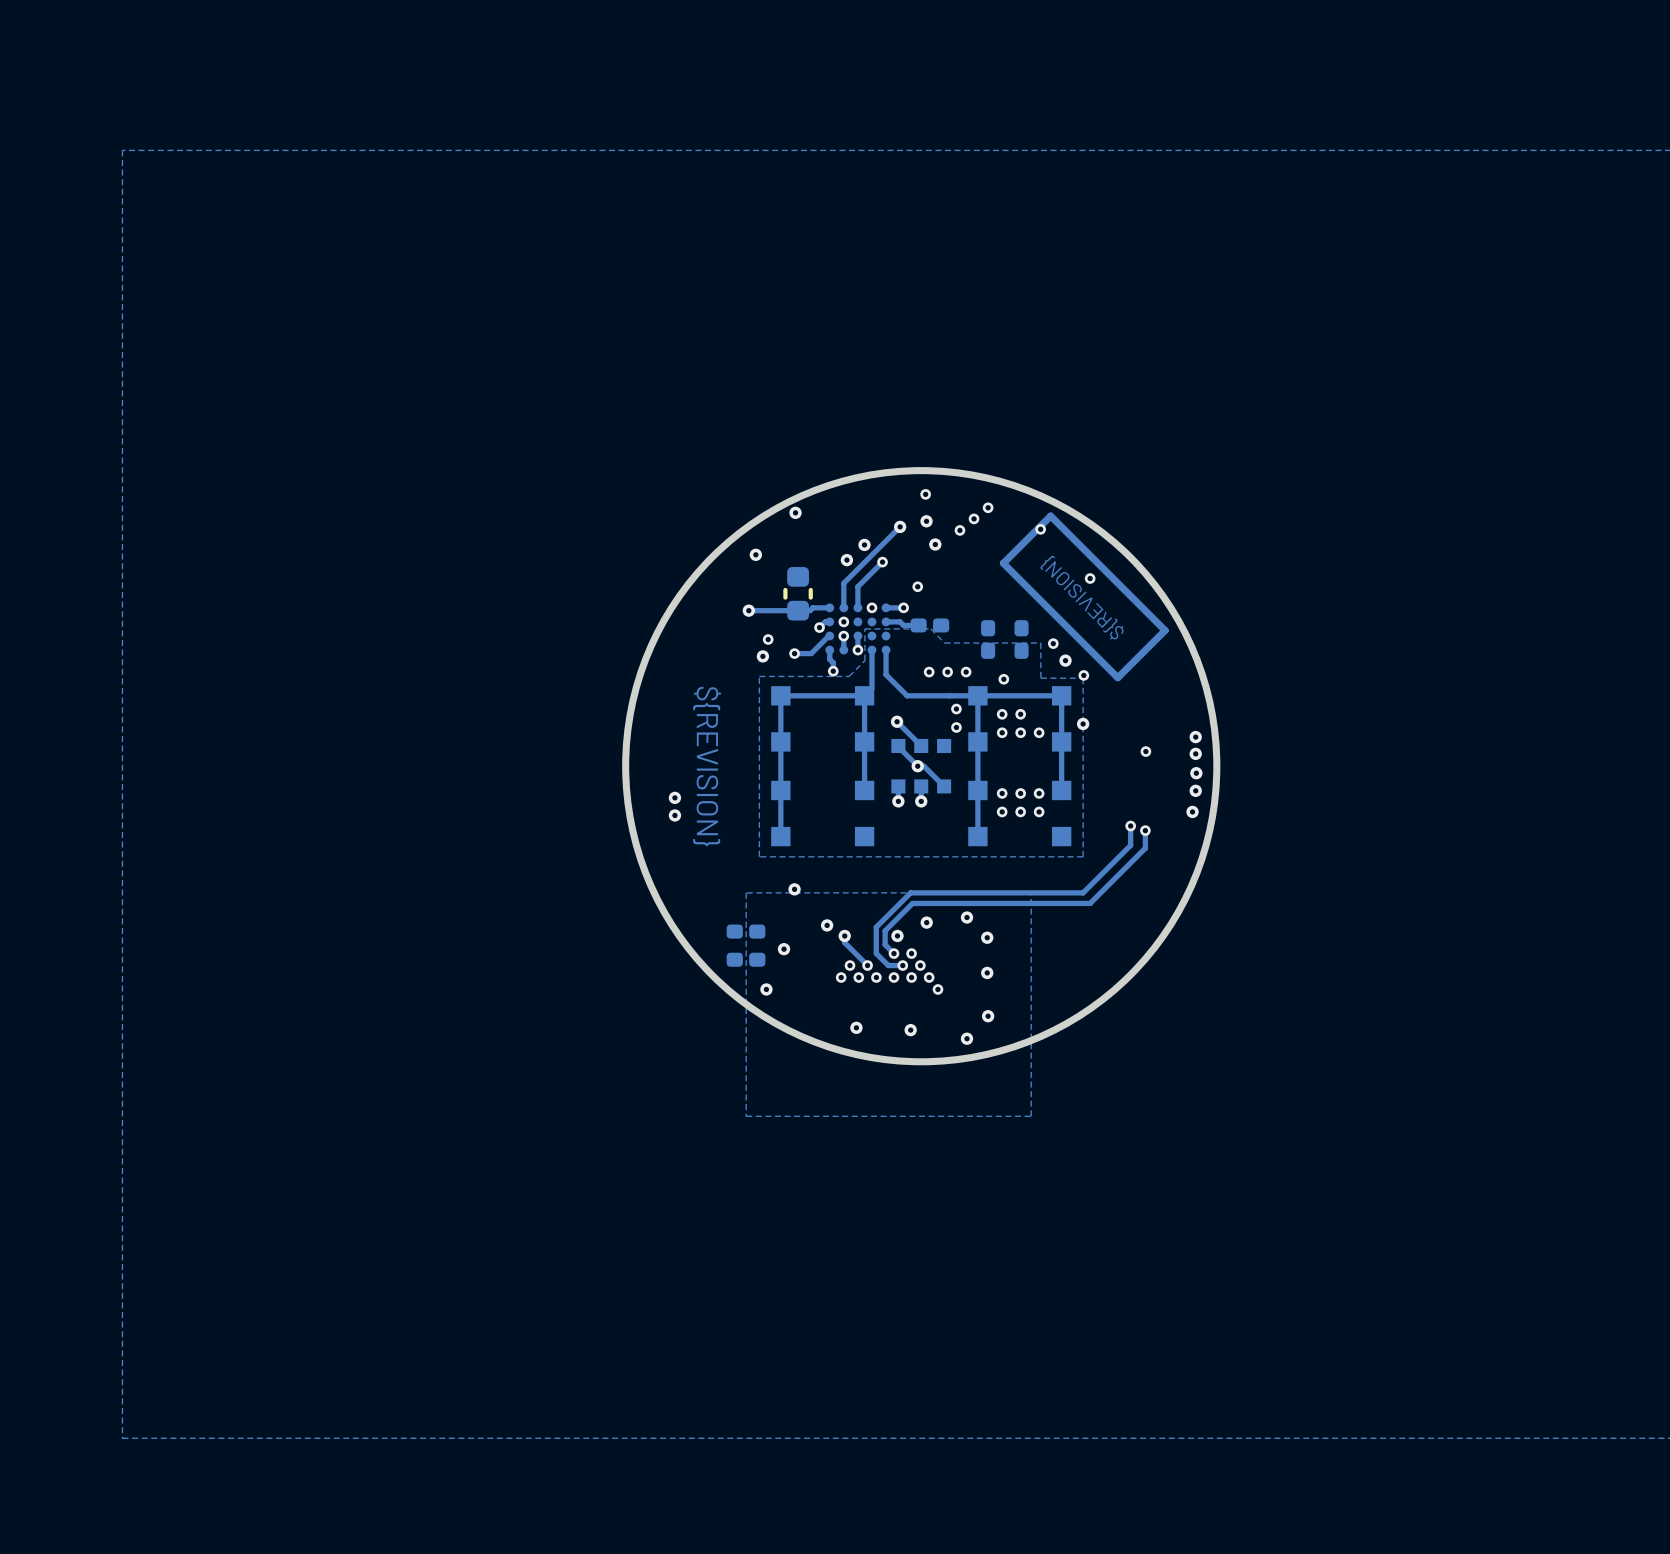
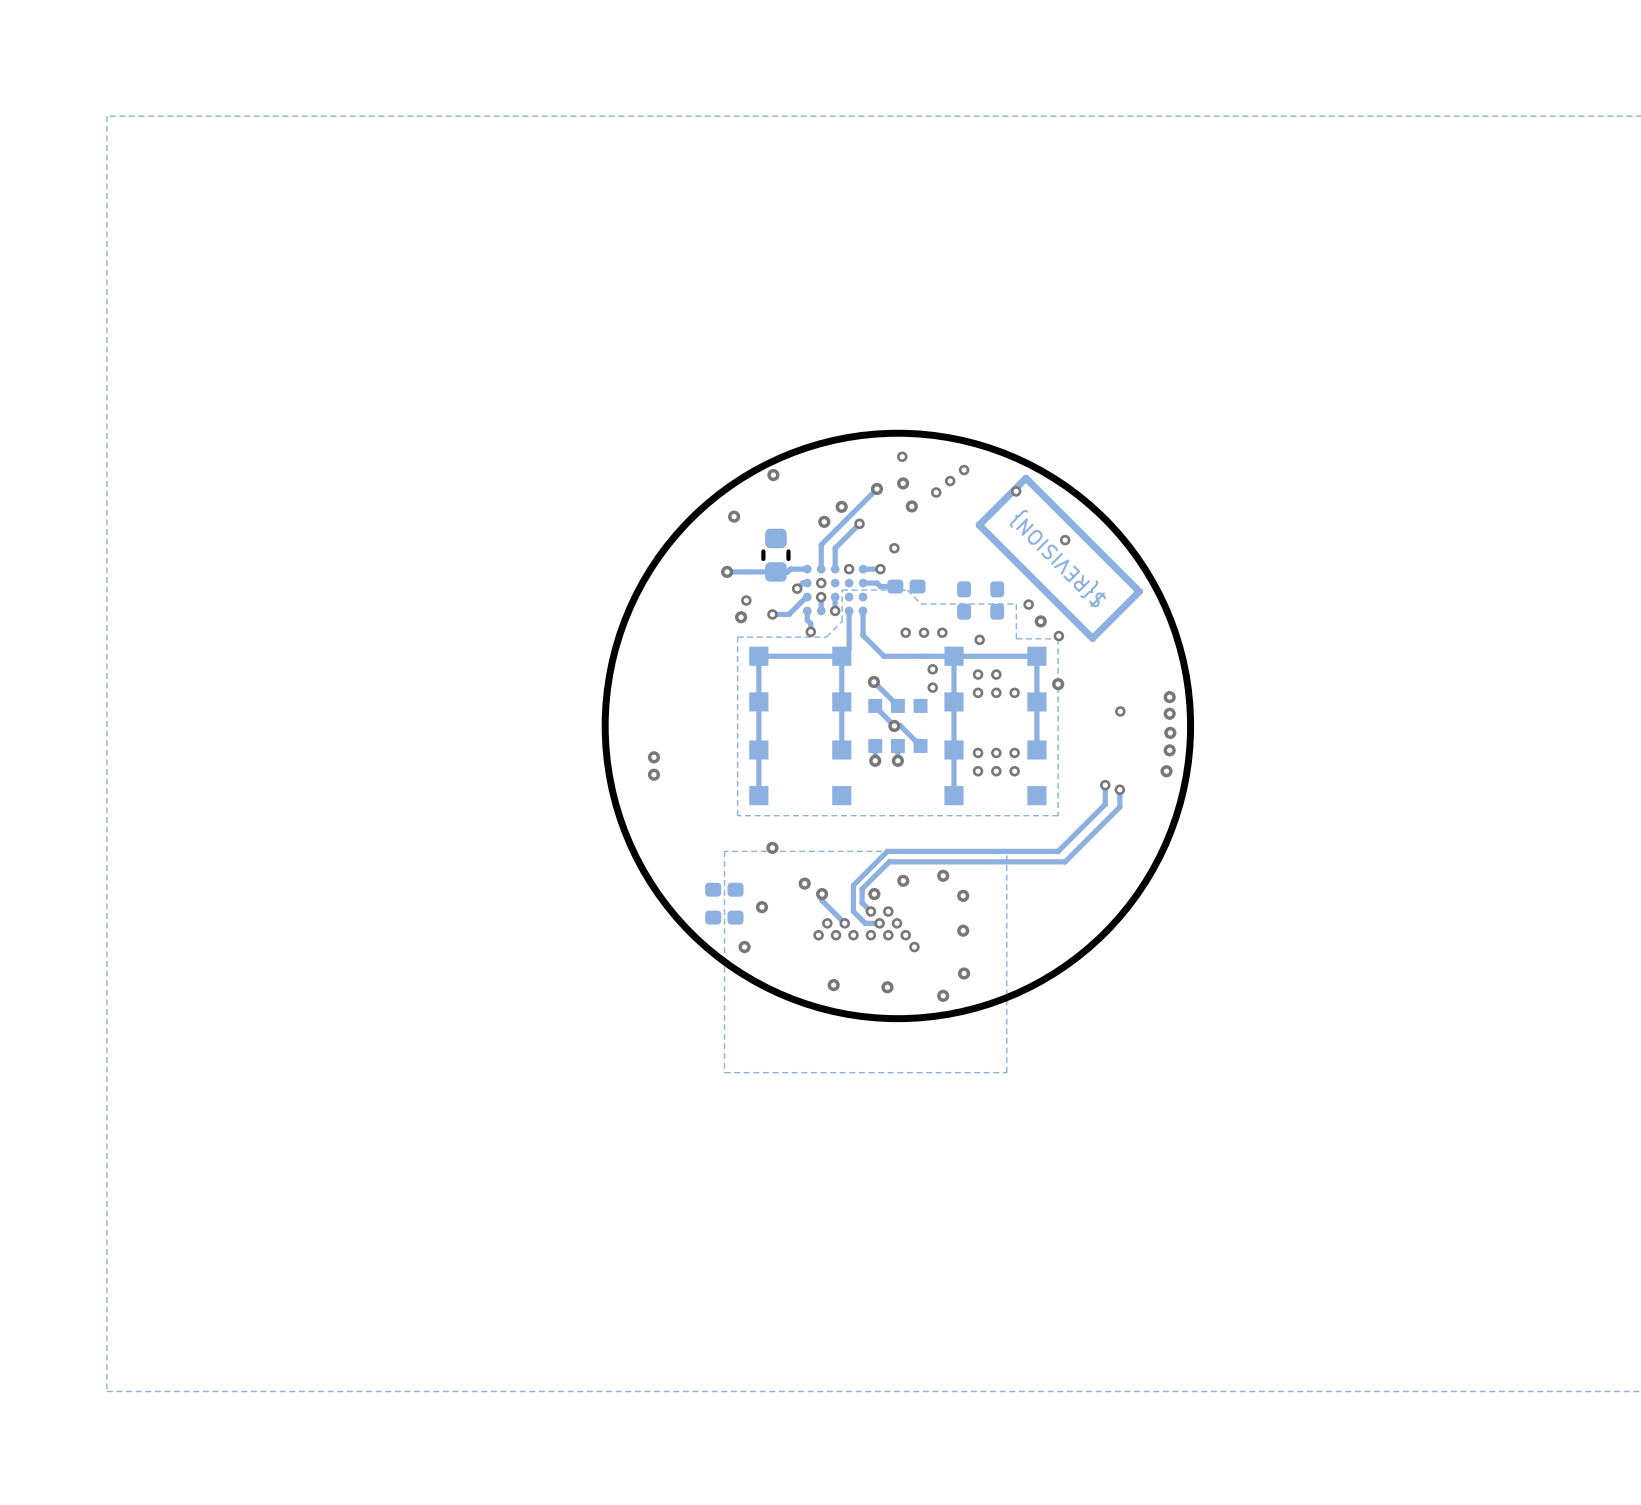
text: ${REVISION} (707, 766) -> none

